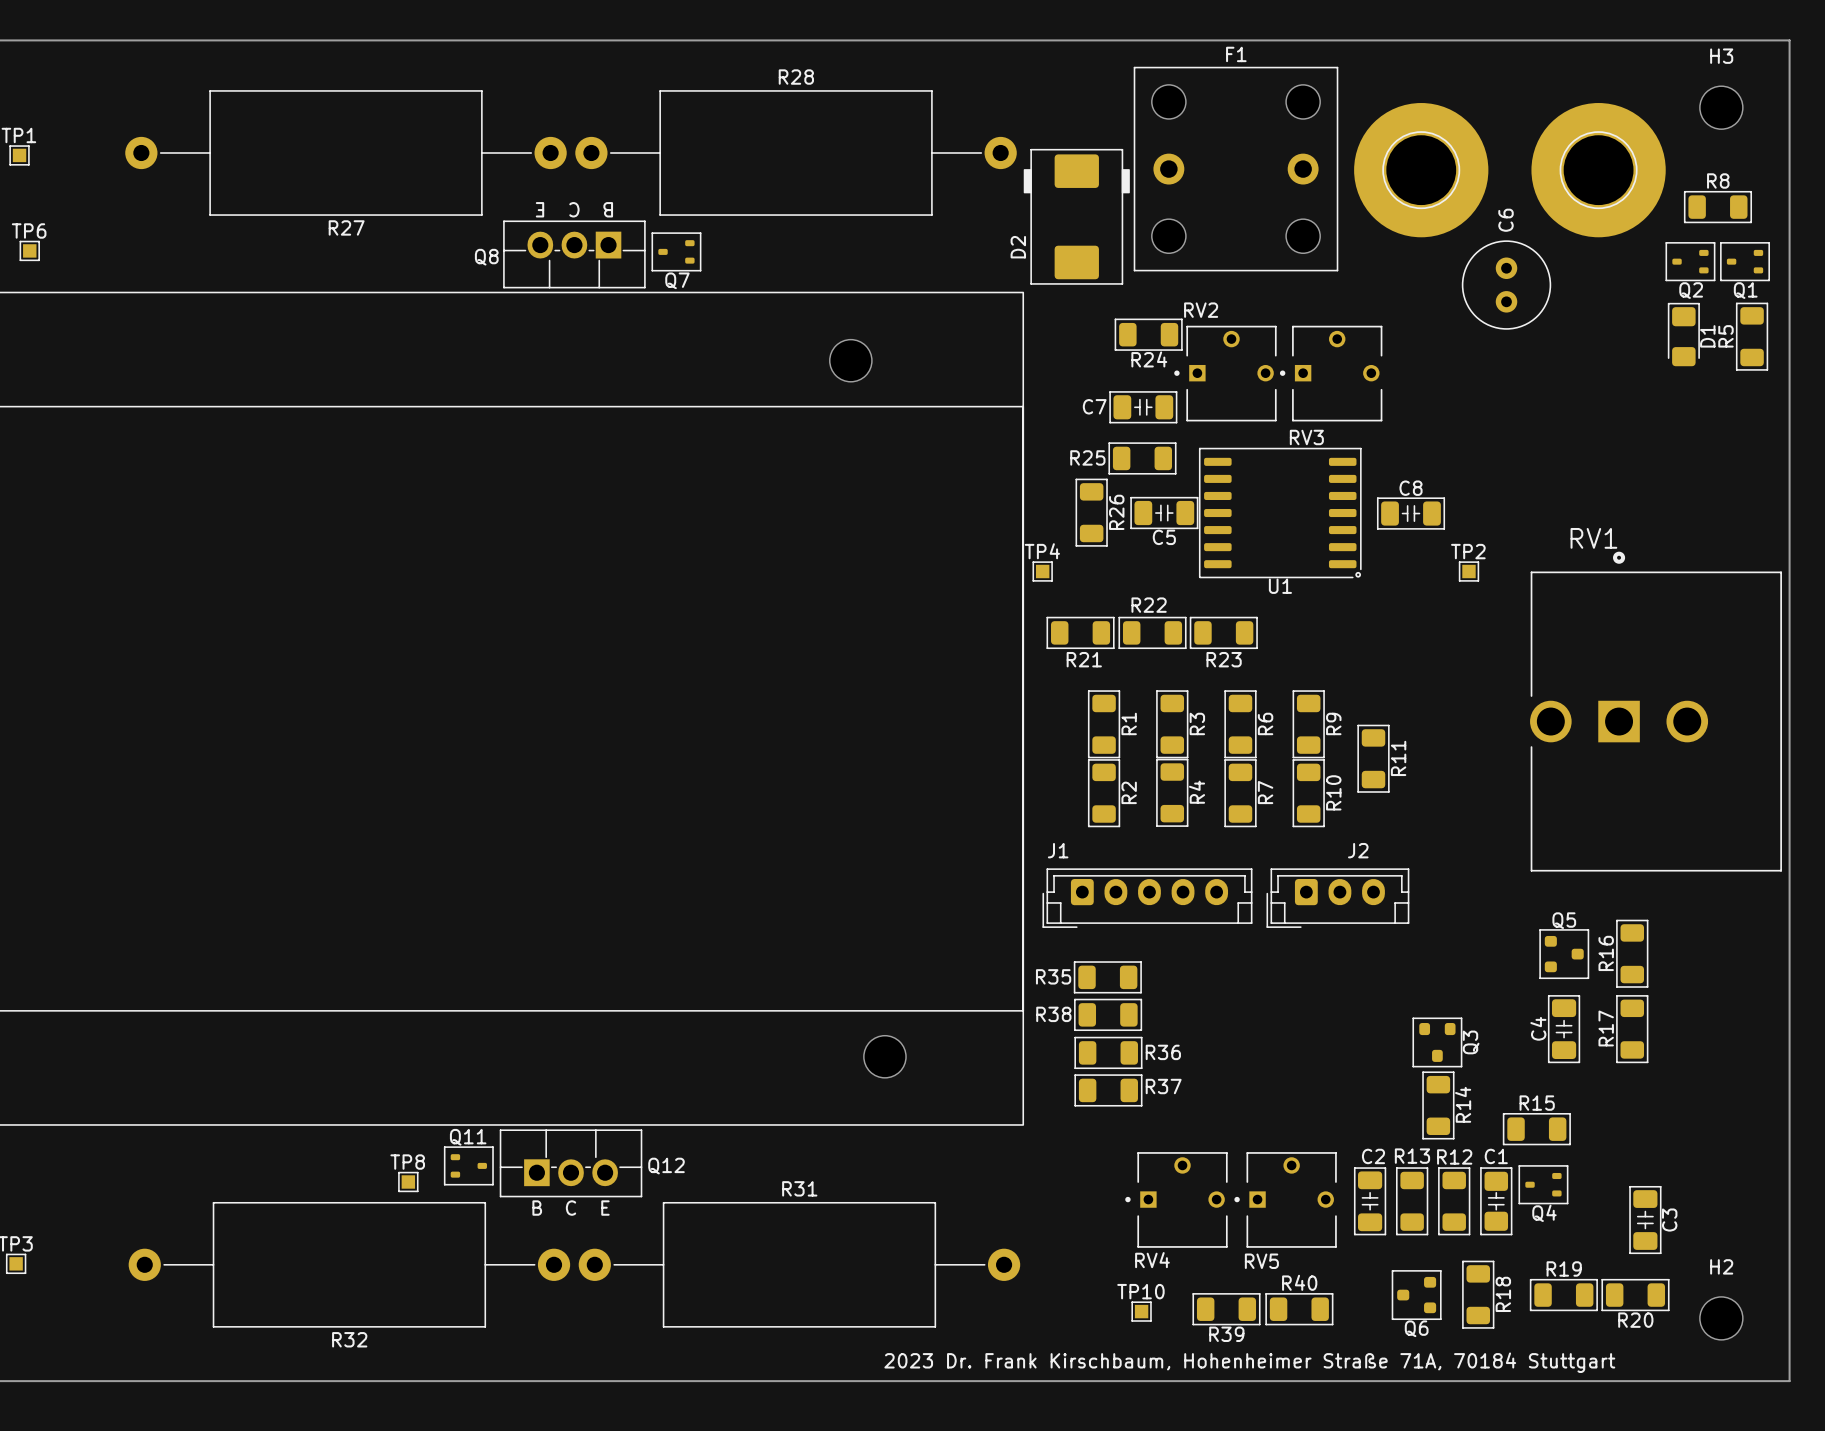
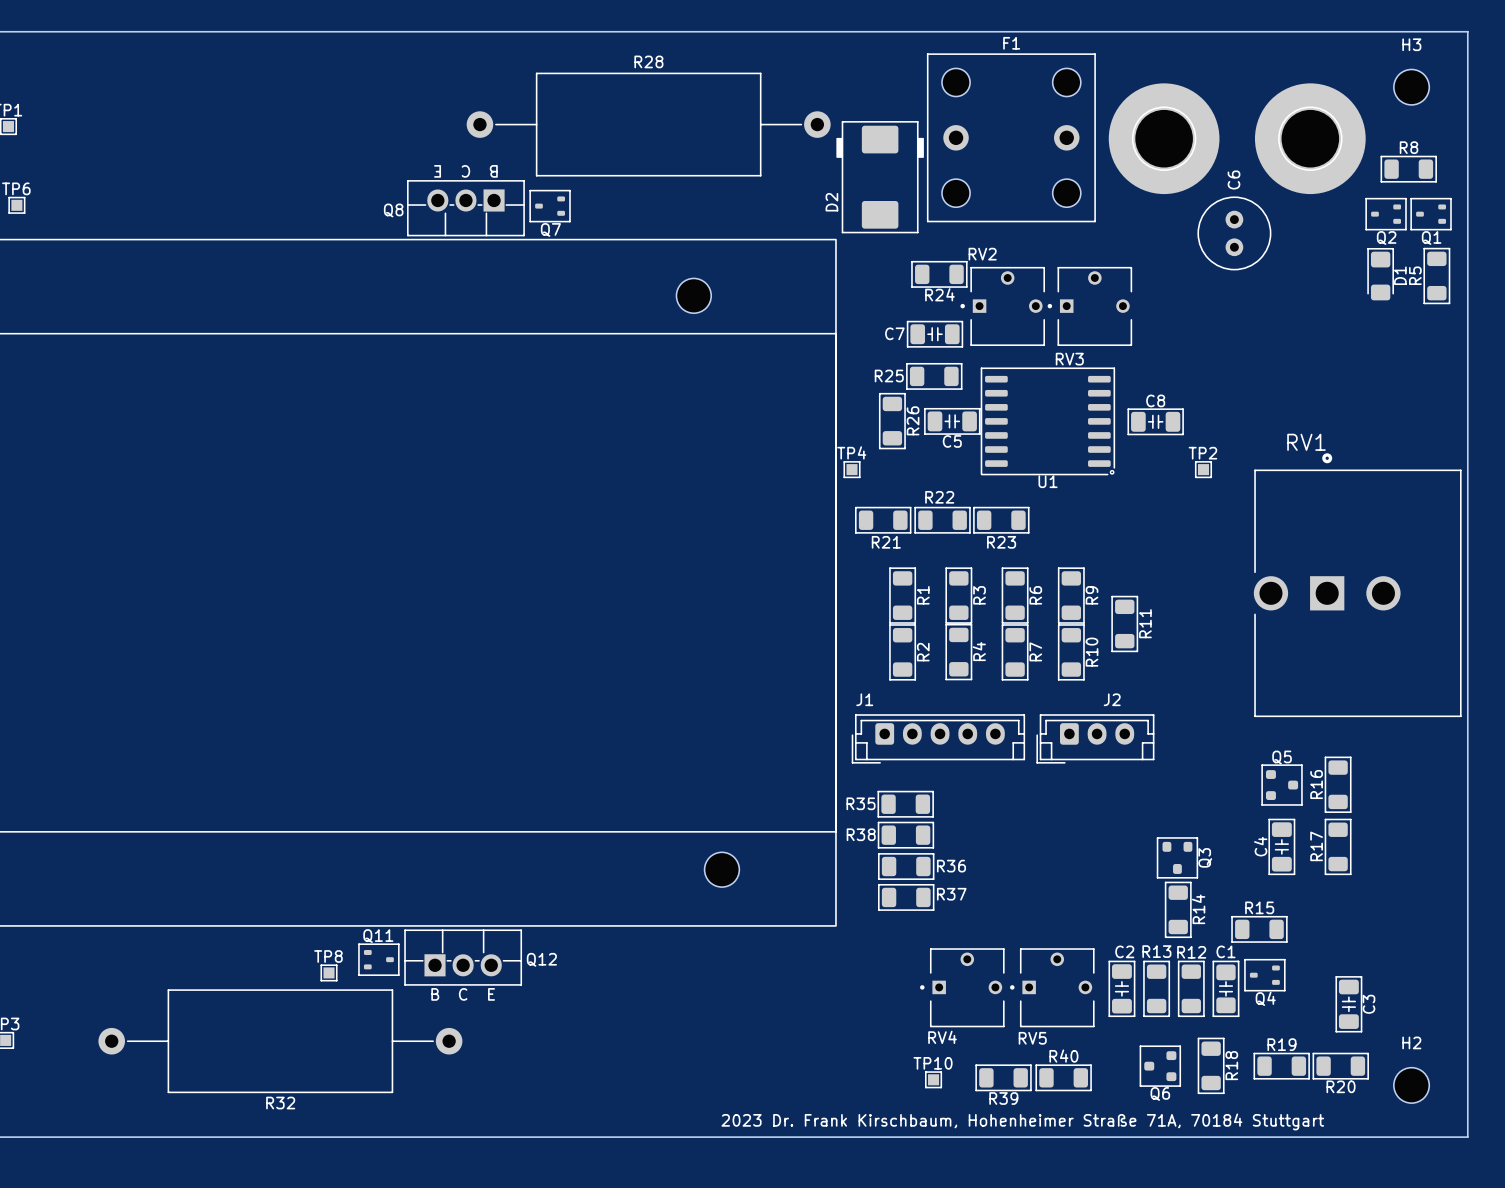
R27: (345, 152) -> none
R31: (799, 1264) -> none

